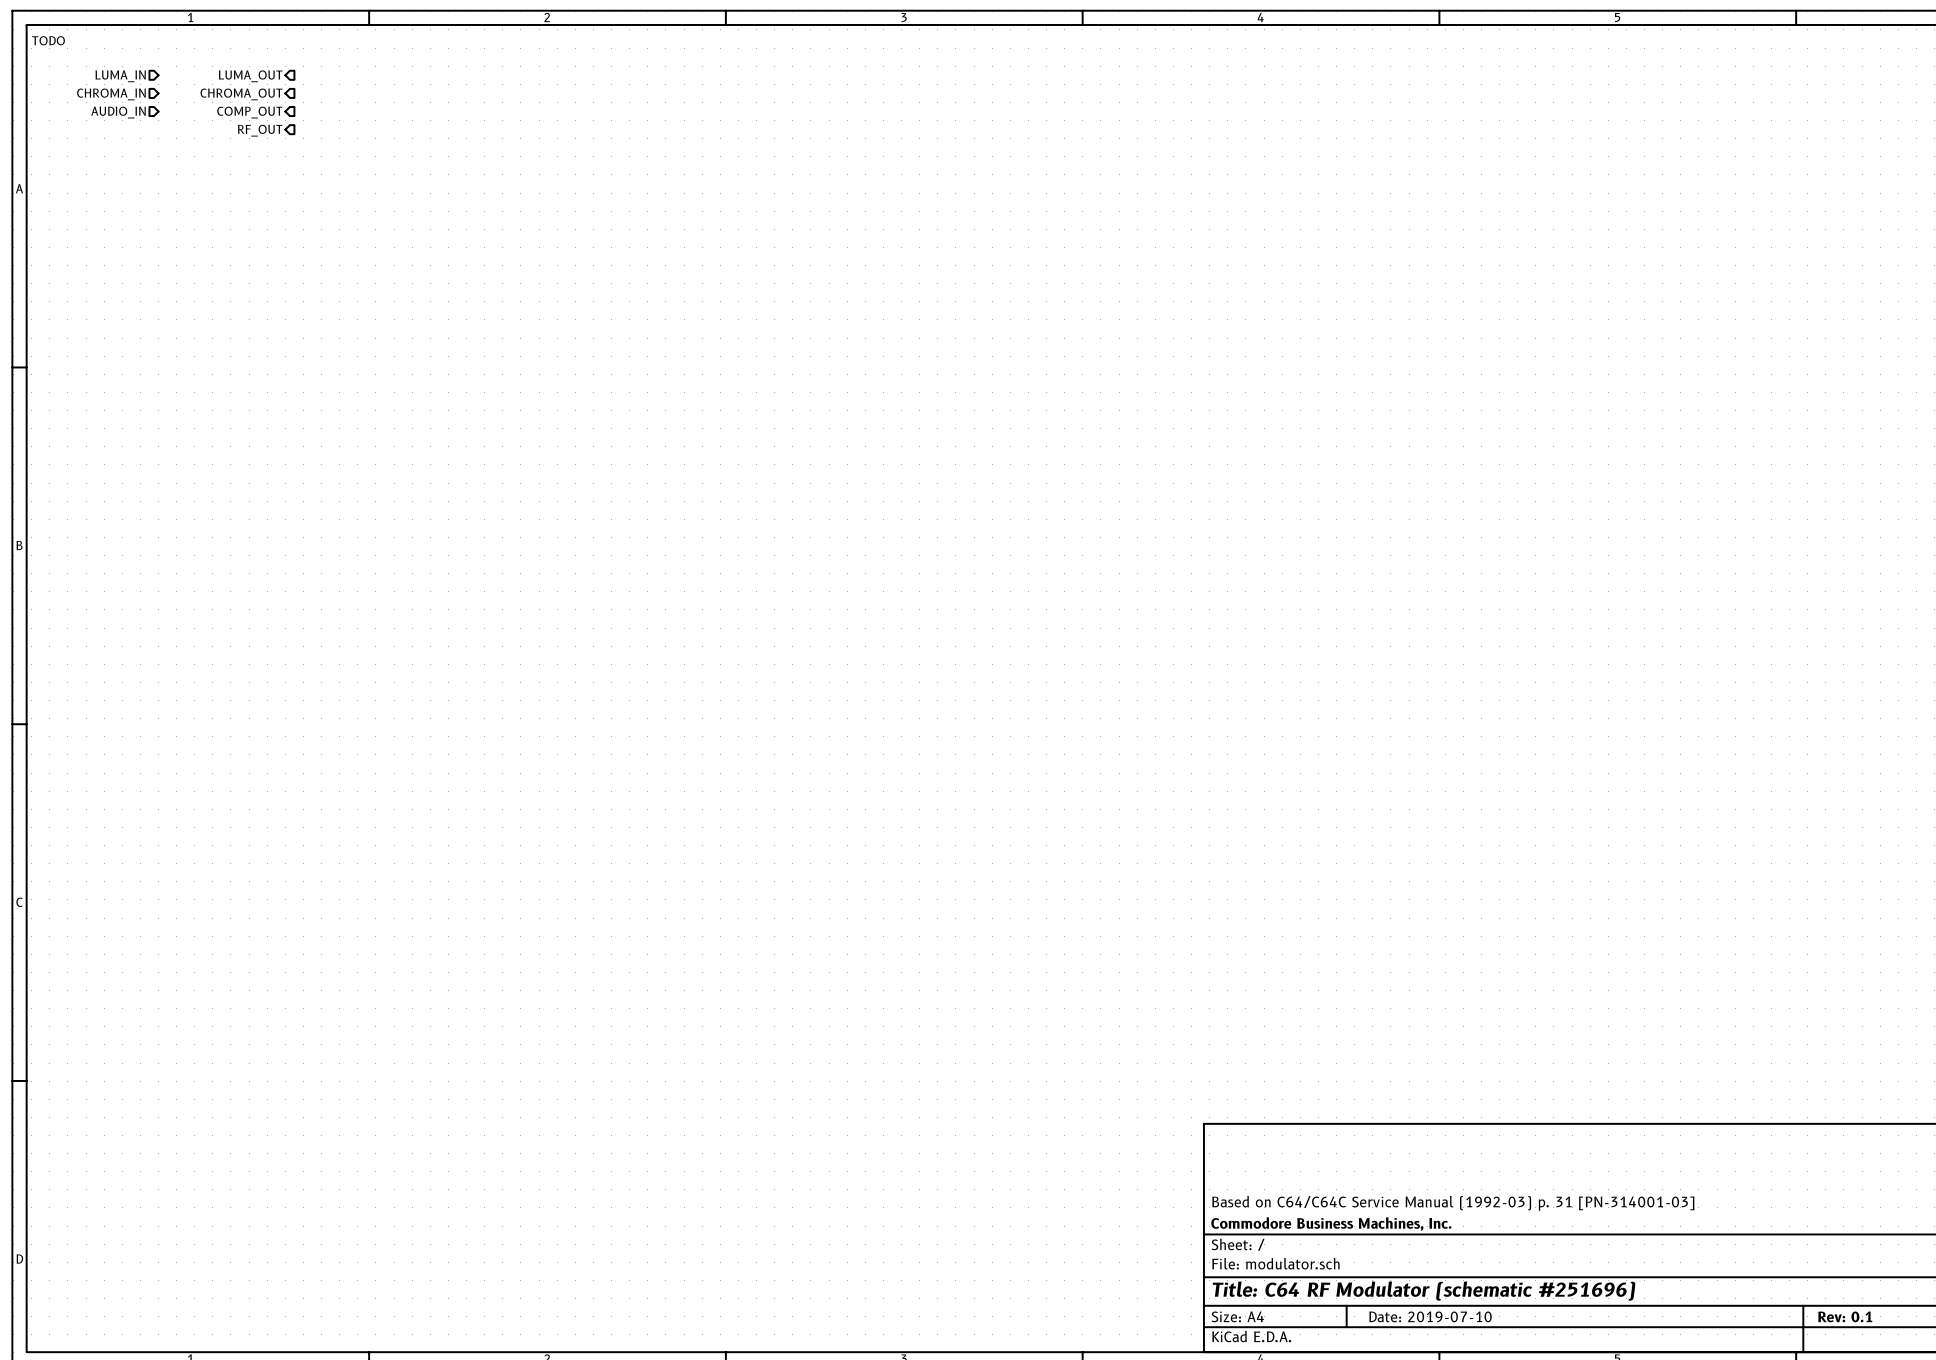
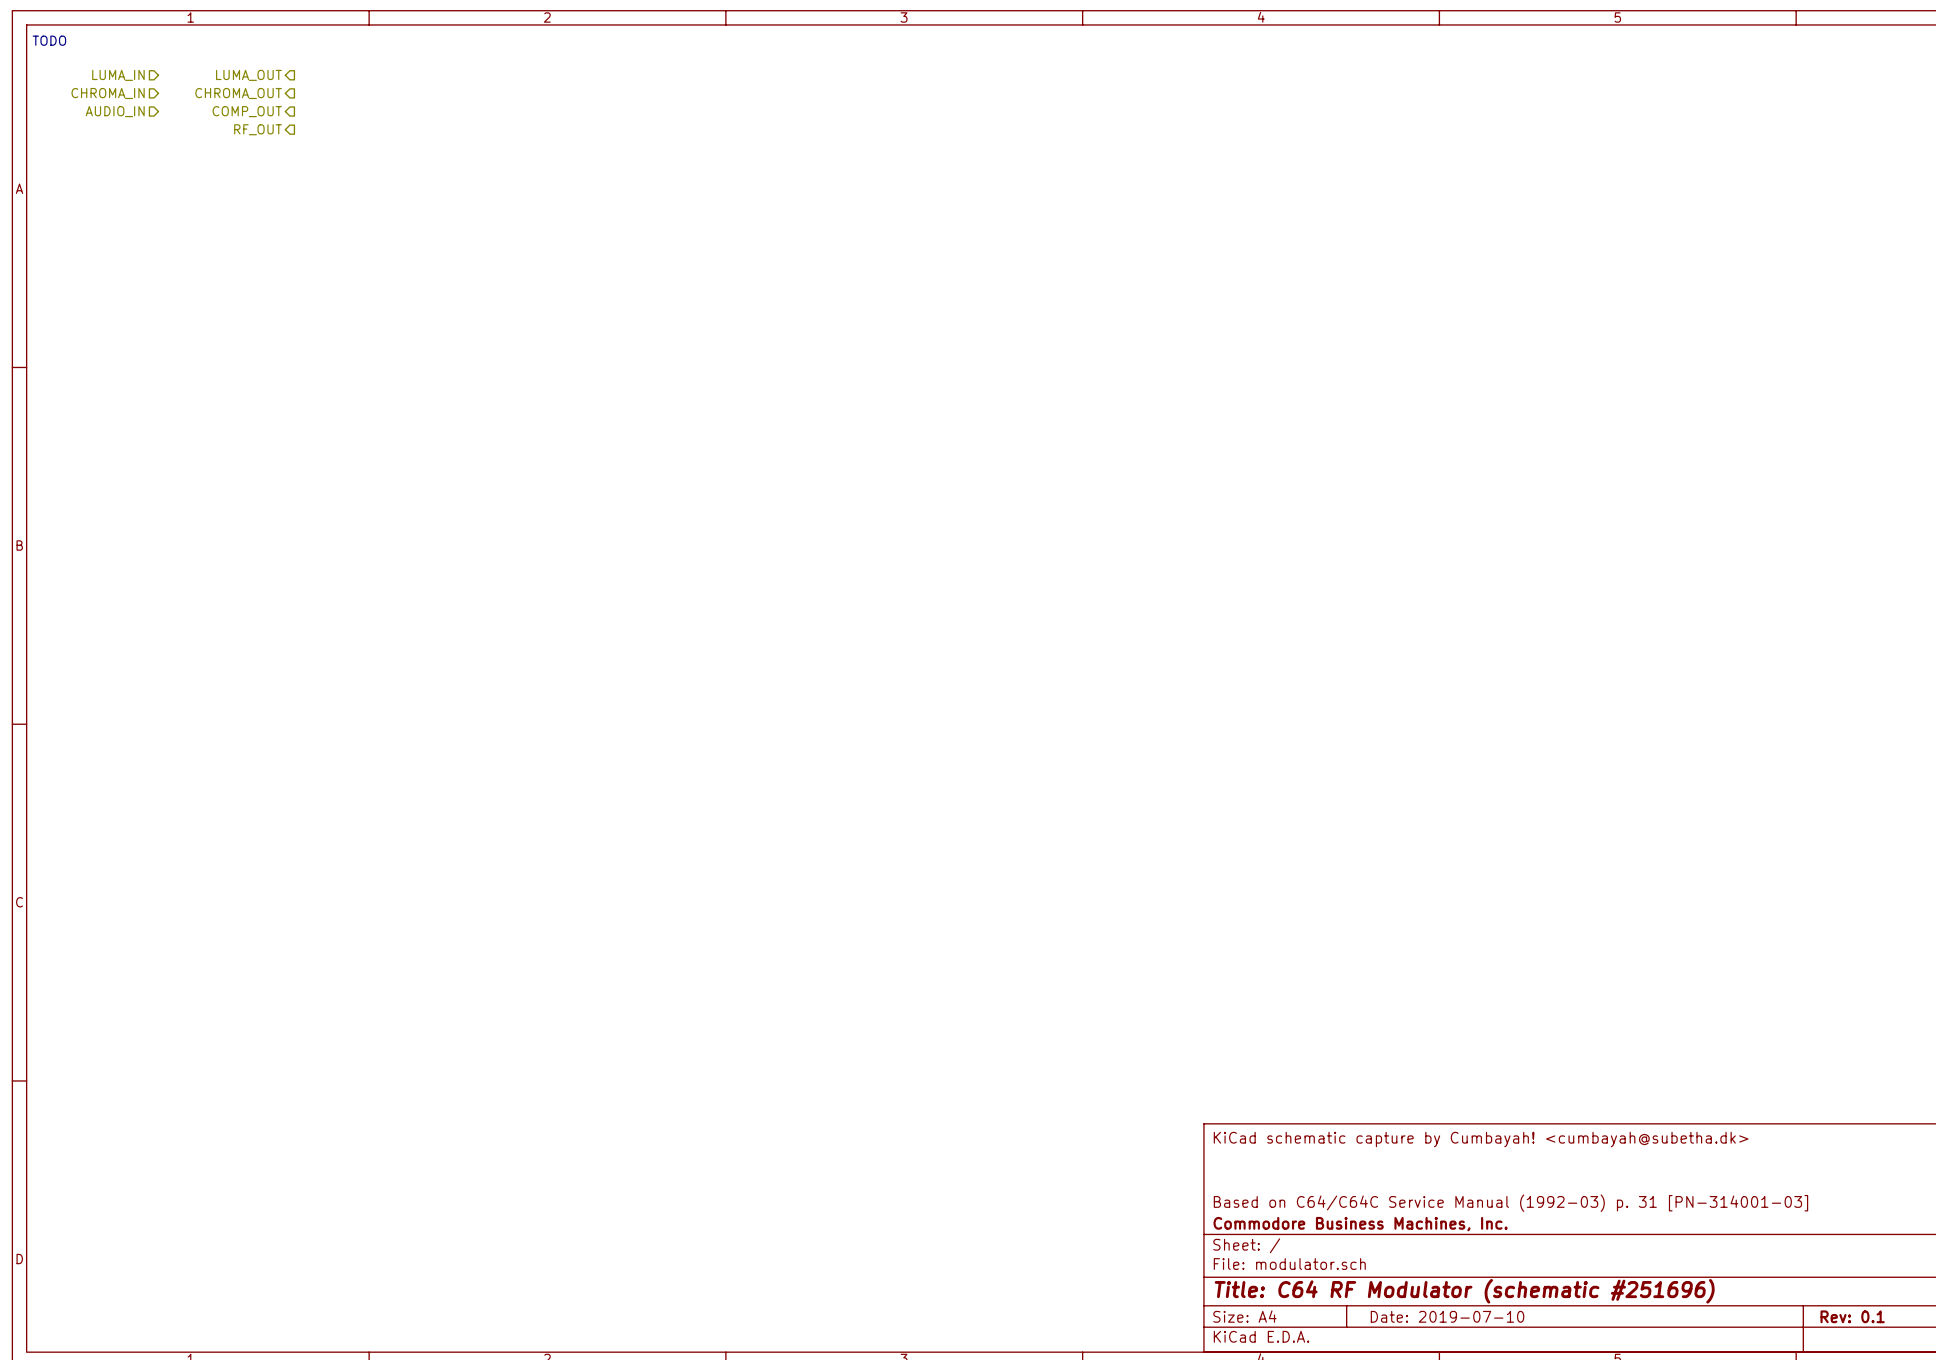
title block: none -> KiCad schematic capture by Cumbayah! <cumbayah@subetha.dk> (1481, 1139)

